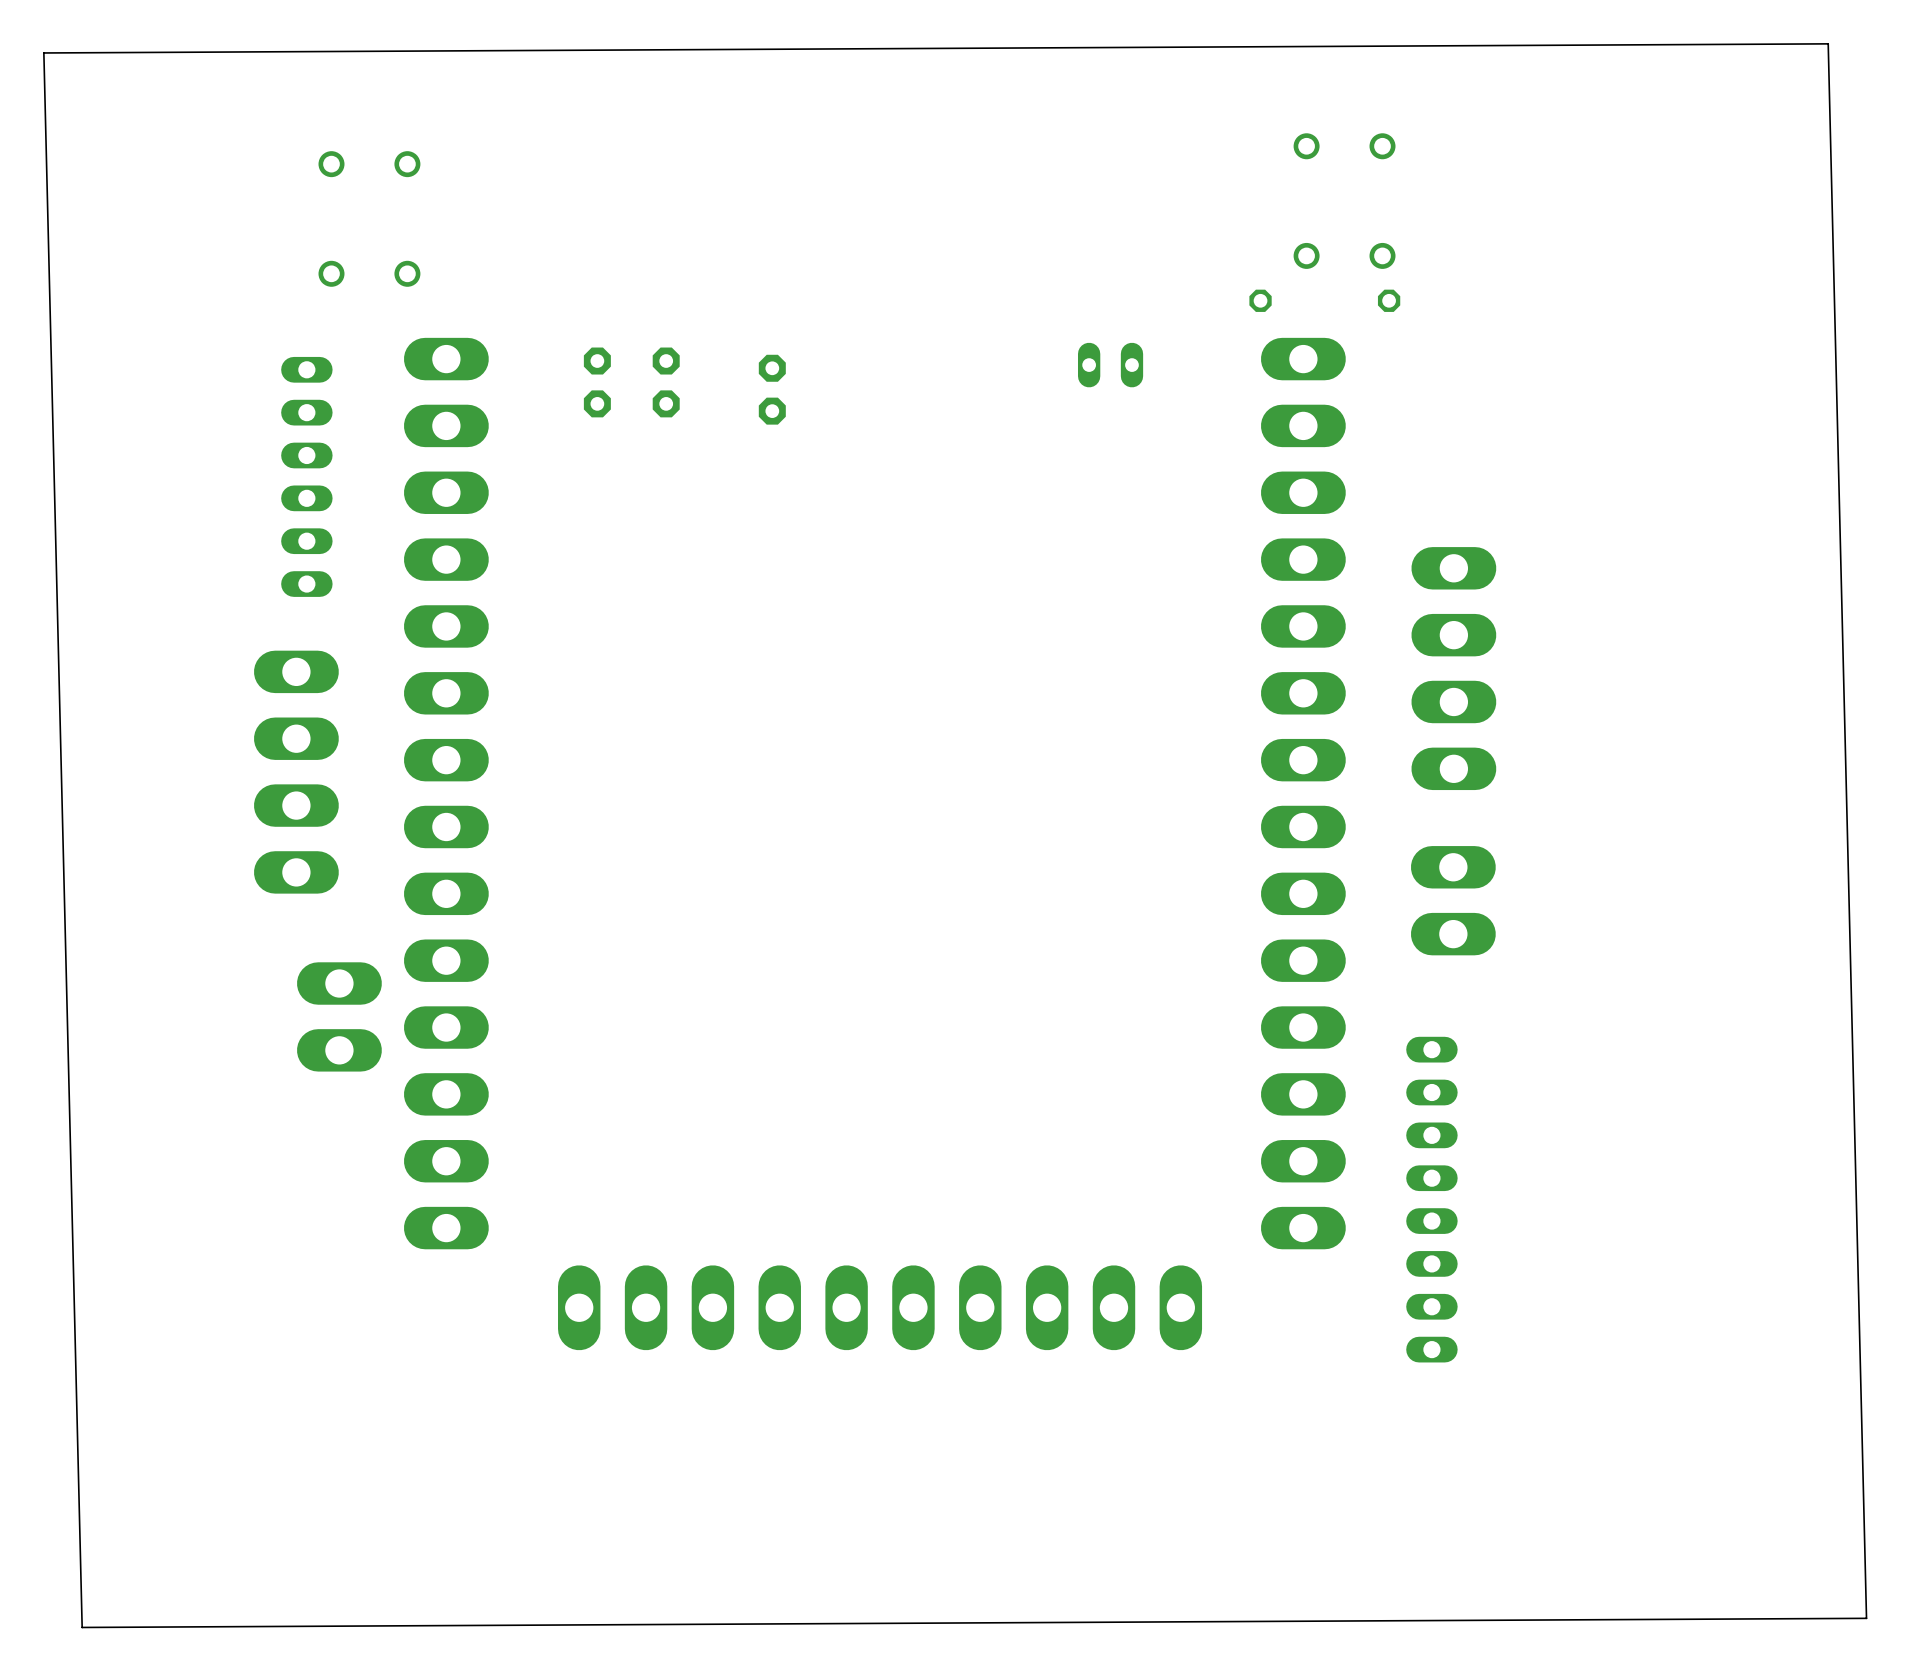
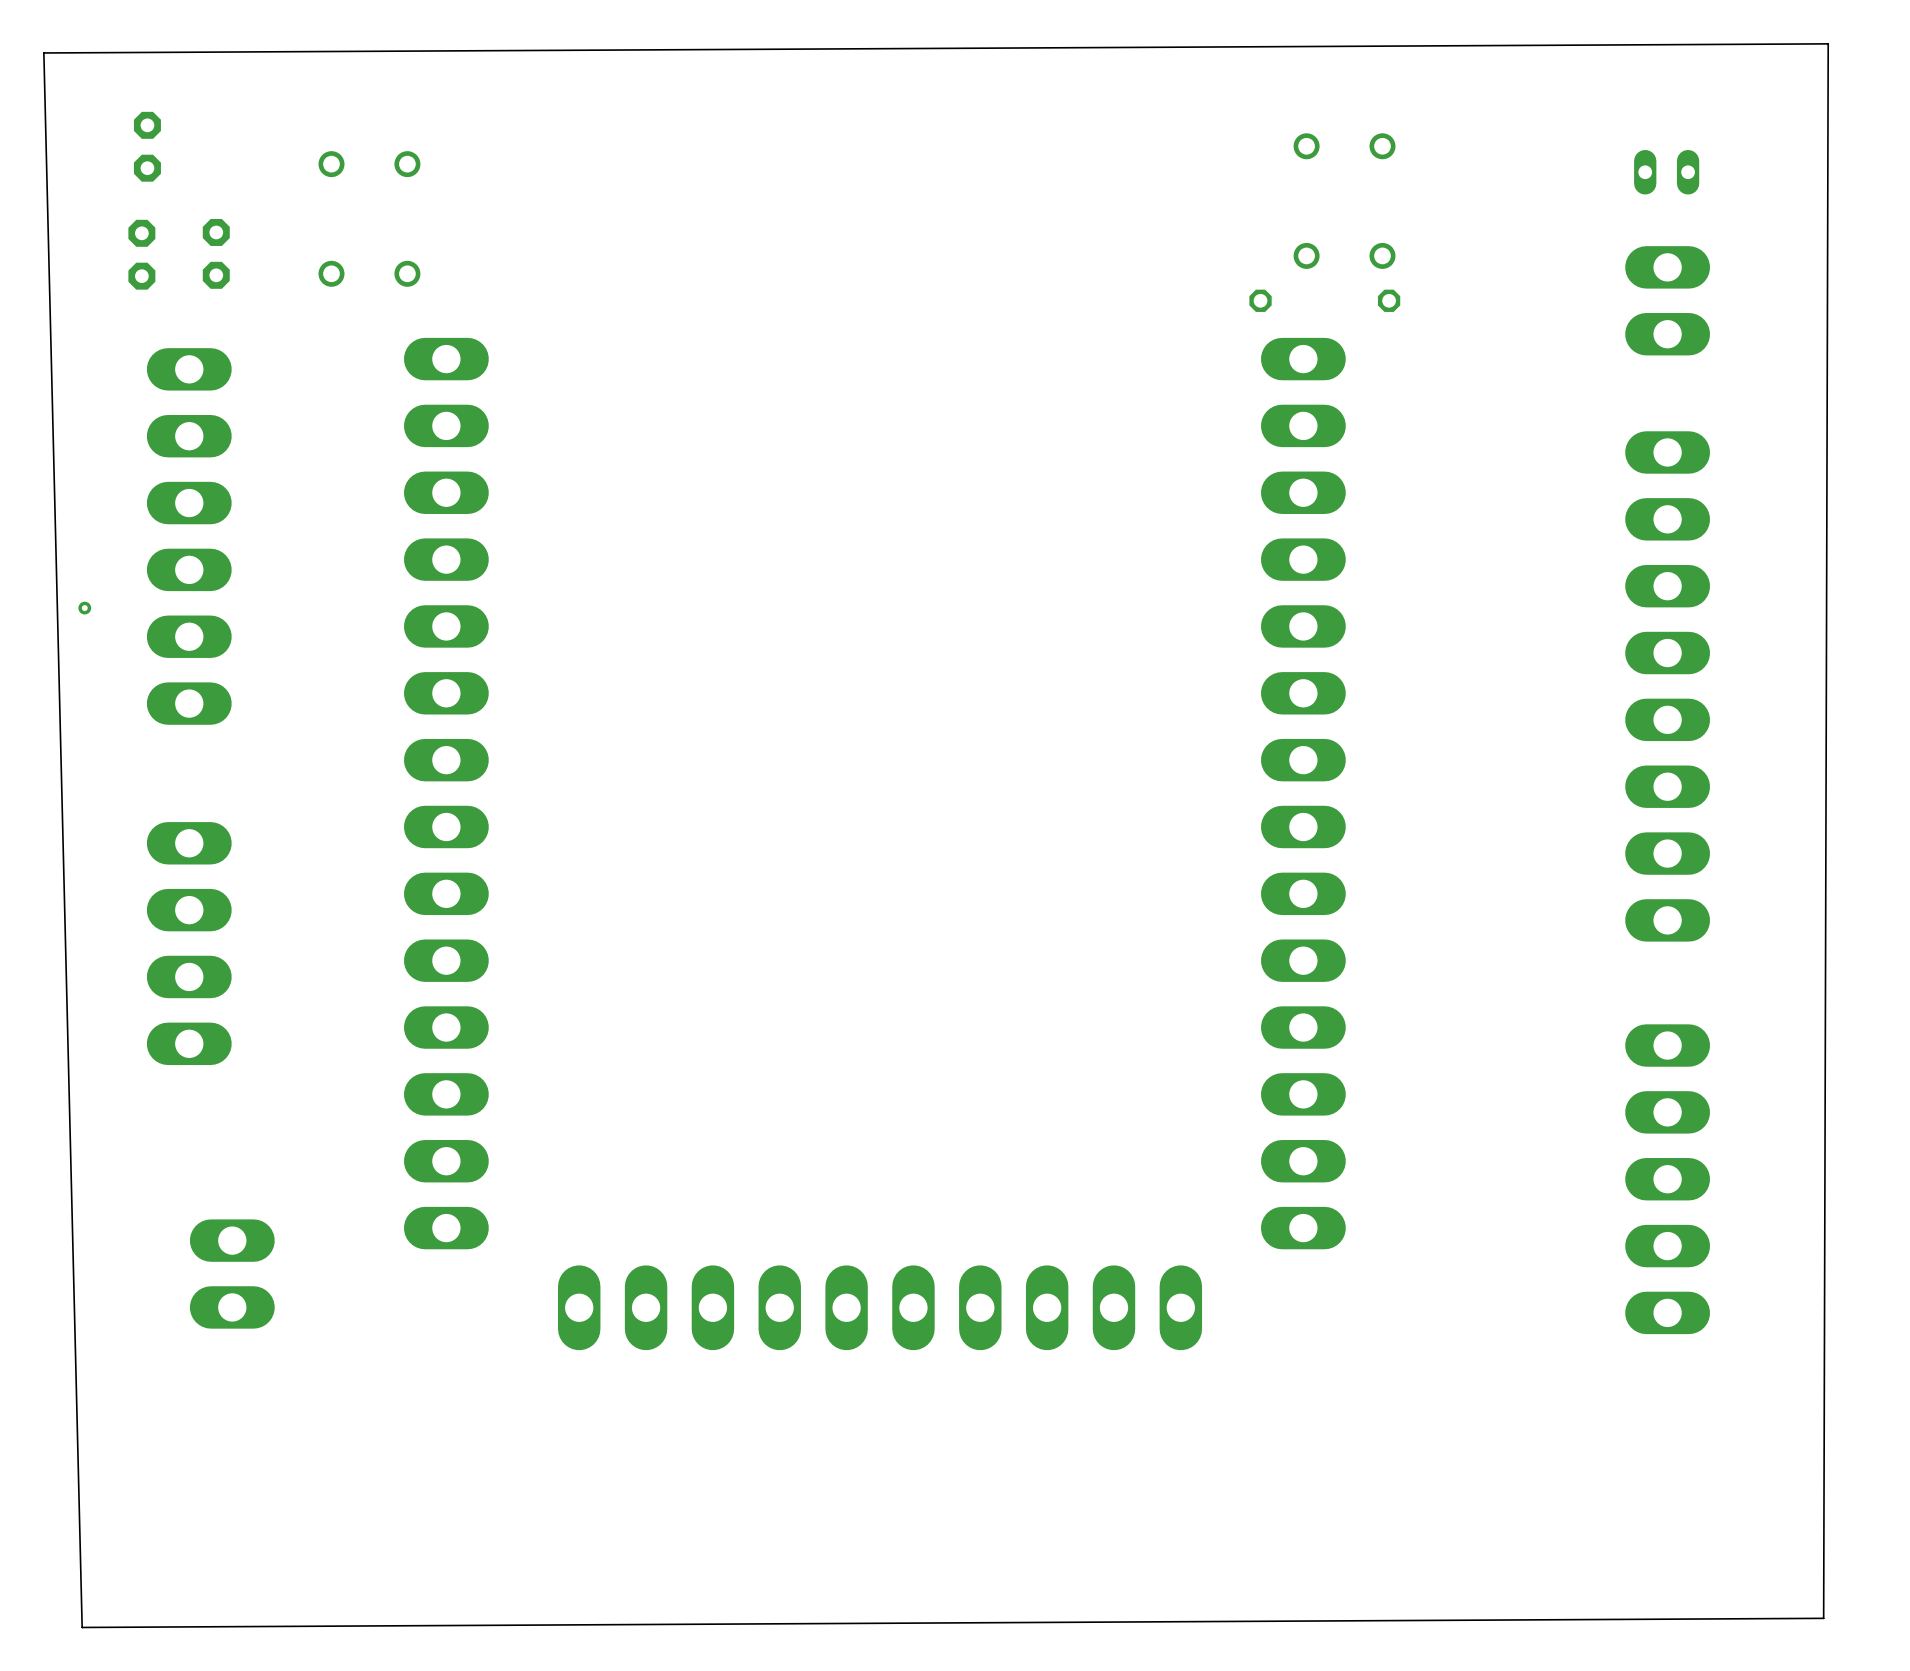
board edge: (1828, 43) (1866, 1618) (82, 1627) -> (1828, 43) (1823, 1618) (82, 1627)
part: none -> (147, 146)
part: none -> (1666, 172)
part: none -> (216, 253)
part: none -> (141, 254)
part: none -> (1667, 300)
part: (1110, 365) -> none
part: (597, 382) -> none
part: (666, 382) -> none
part: (772, 389) -> none
part: (306, 476) -> none
part: none -> (189, 536)
via: none -> (84, 608)
part: (1453, 668) -> none
part: none -> (1667, 686)
part position: (296, 772) -> (189, 943)
part: (1453, 900) -> none
part position: (339, 1016) -> (232, 1274)
part: none -> (1667, 1179)
part: (1431, 1199) -> none

